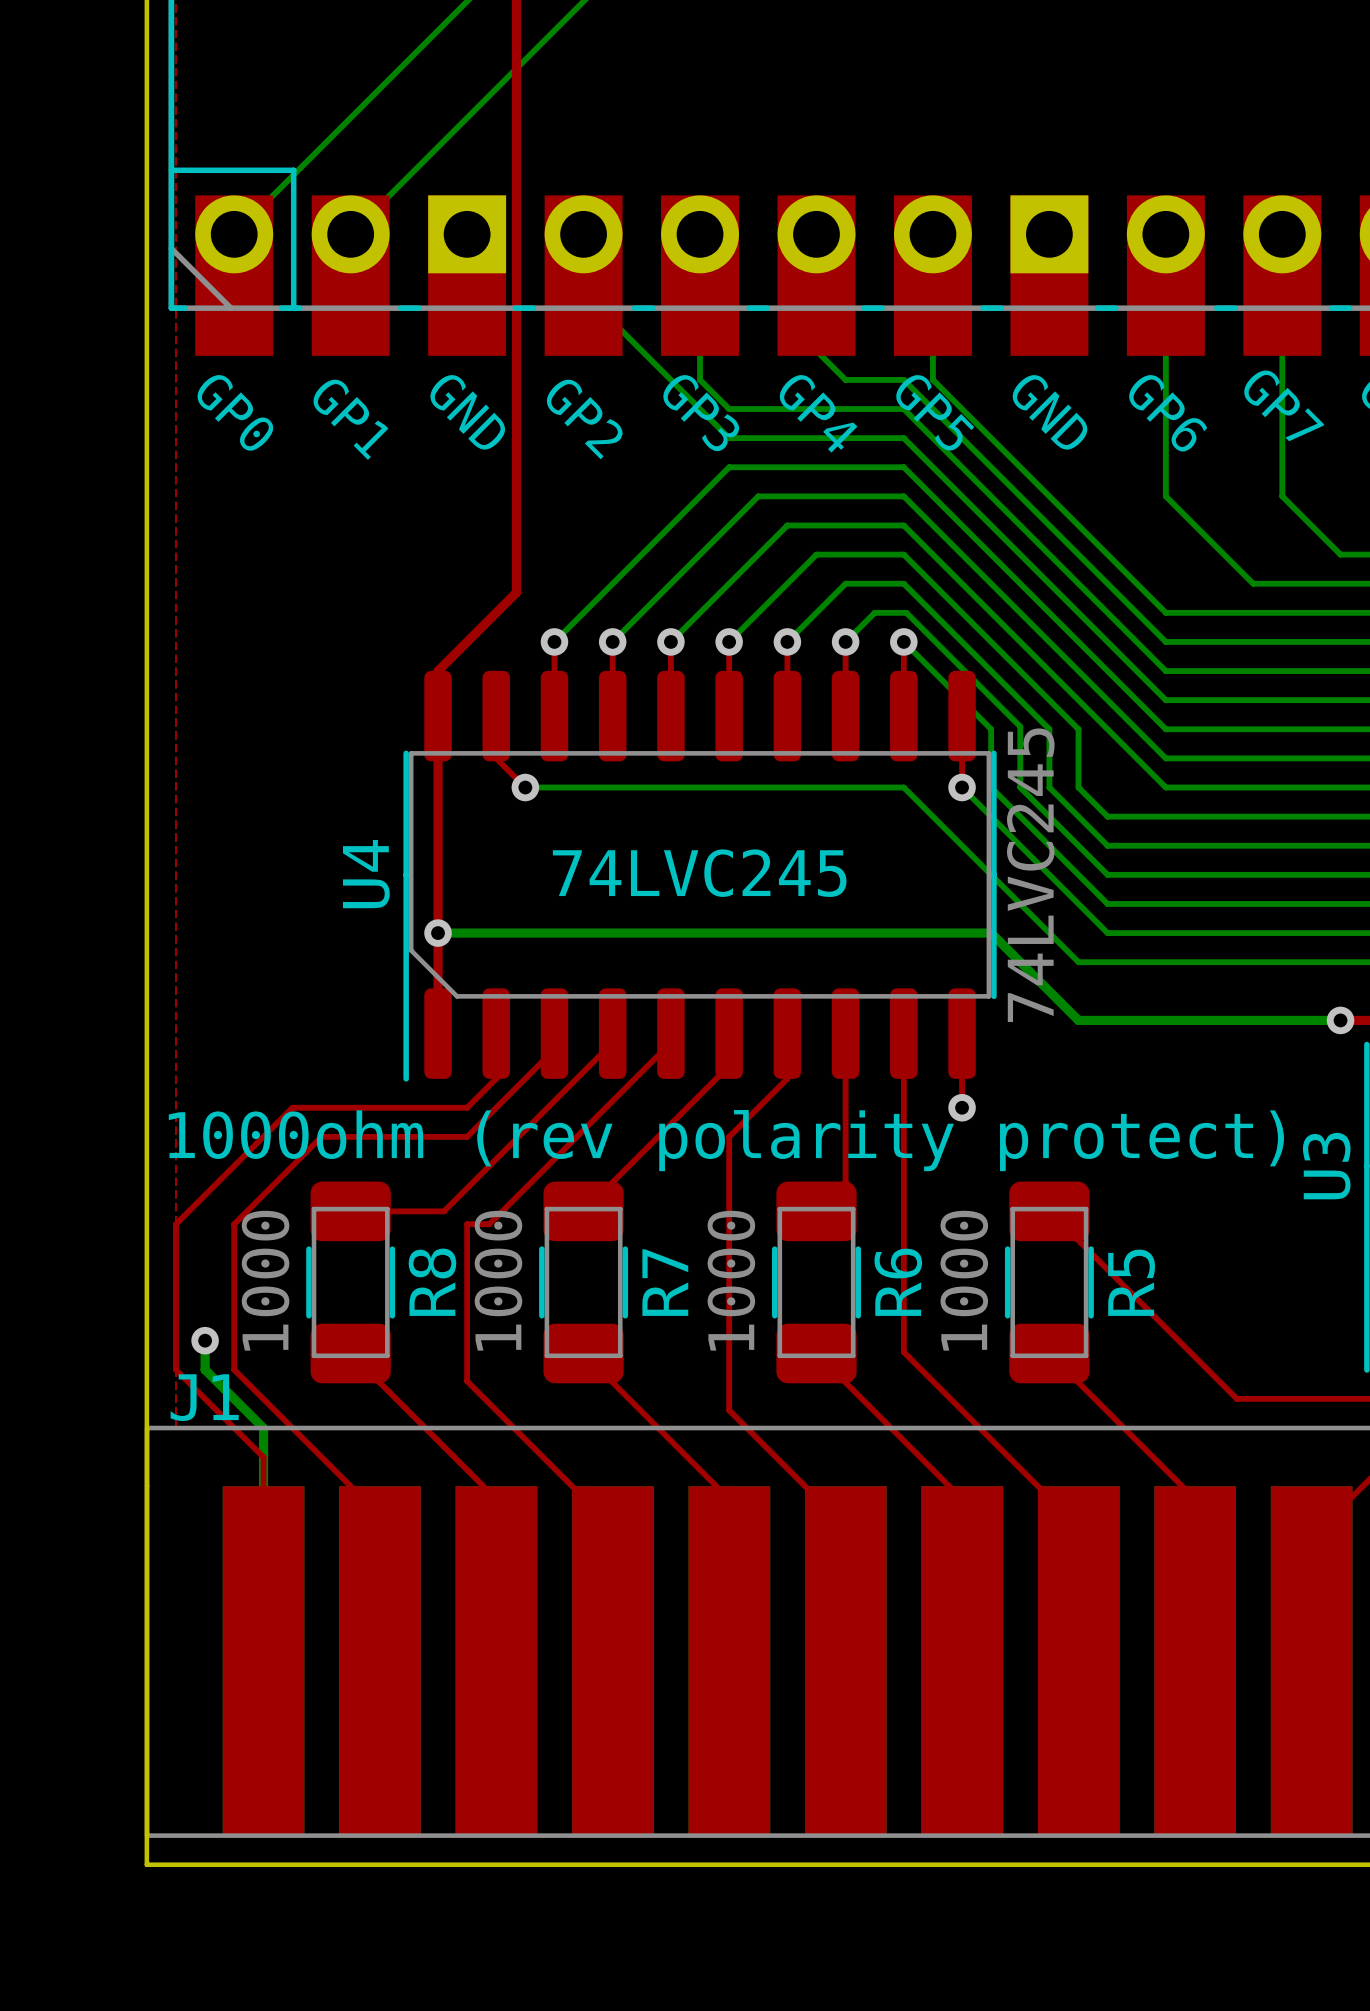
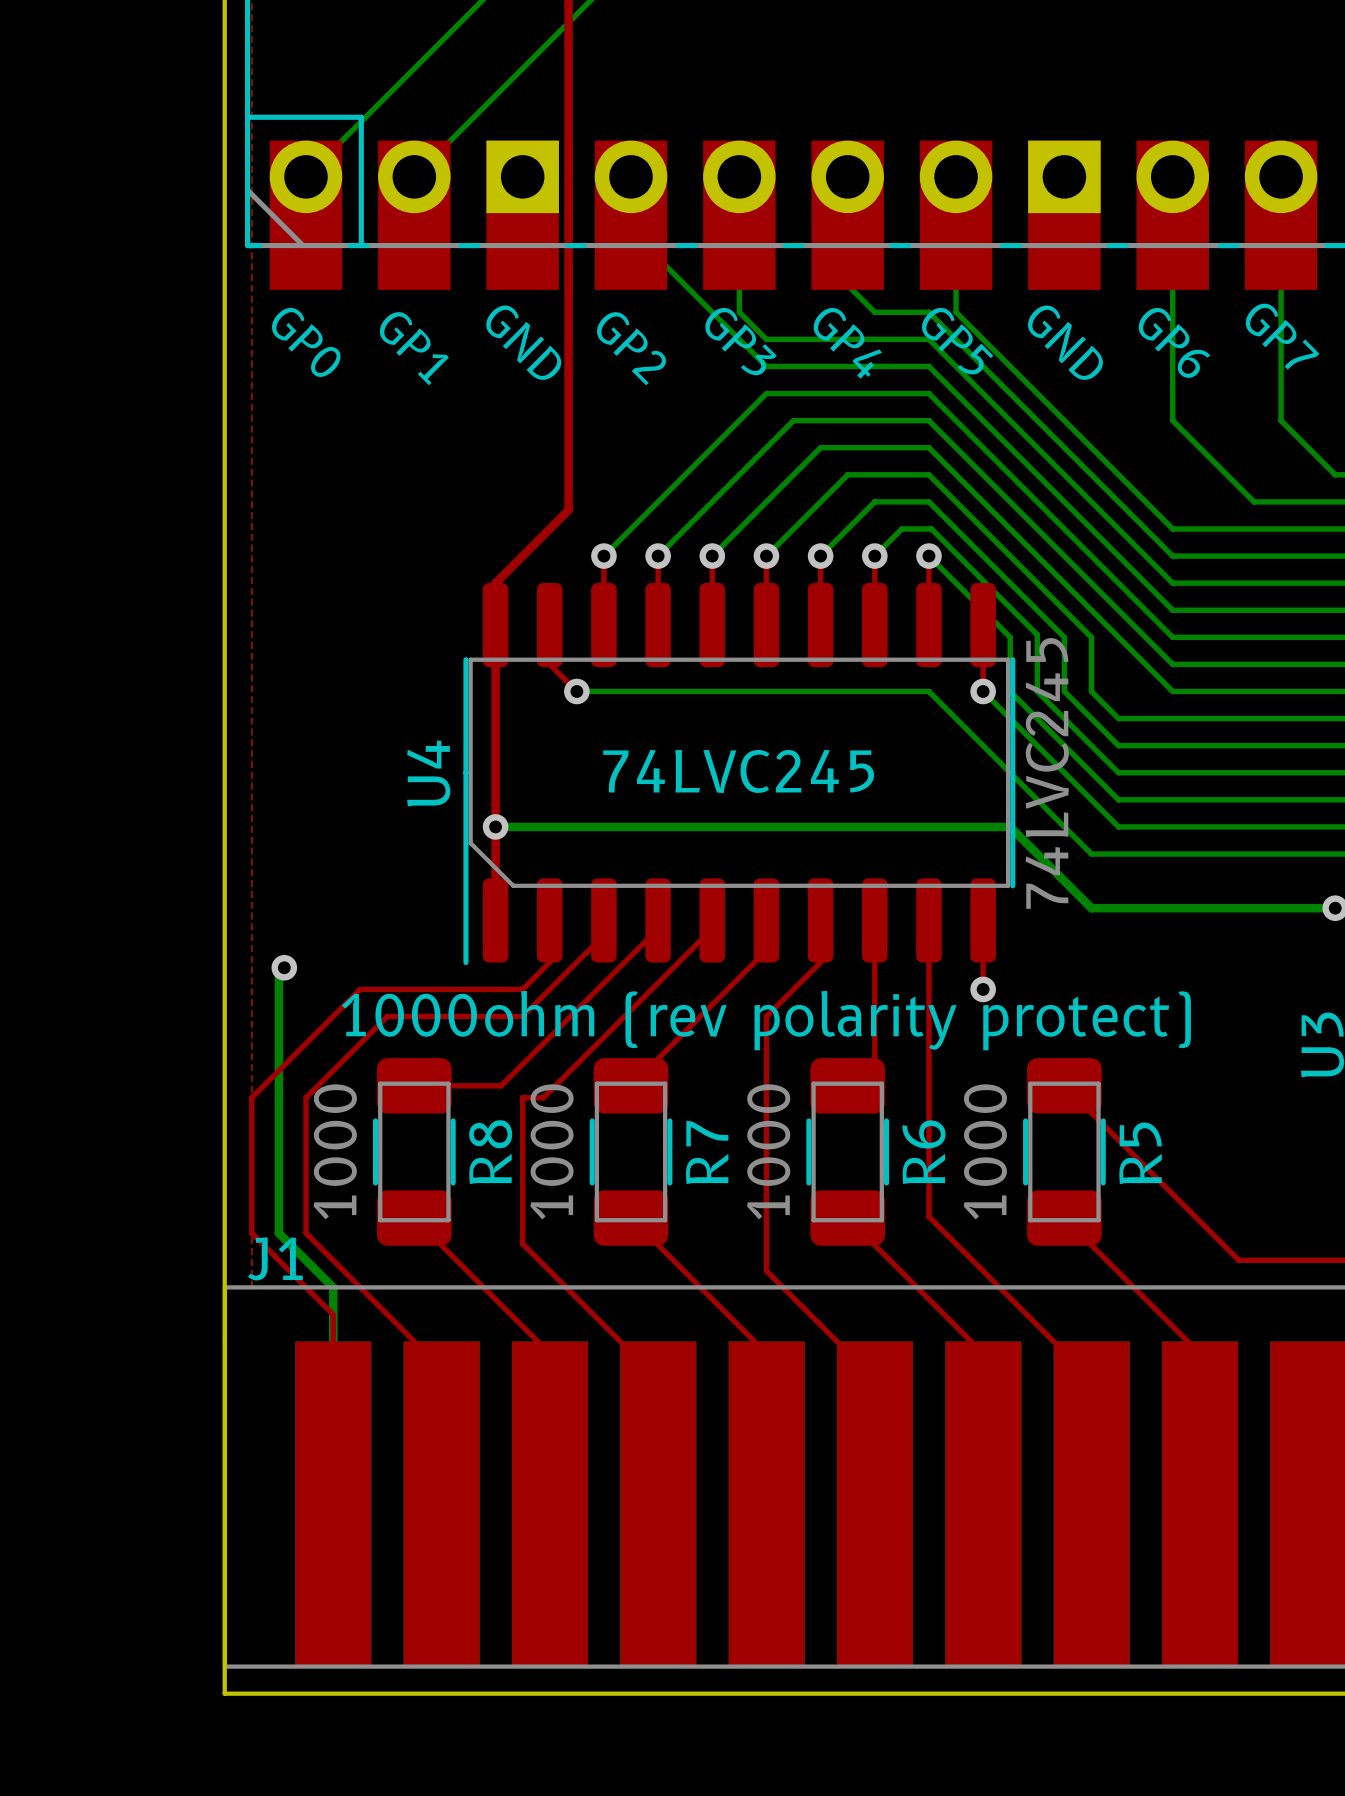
bottom track: none -> (284, 967) (278, 973) (278, 1206)
via position: (205, 1340) -> (284, 967)

